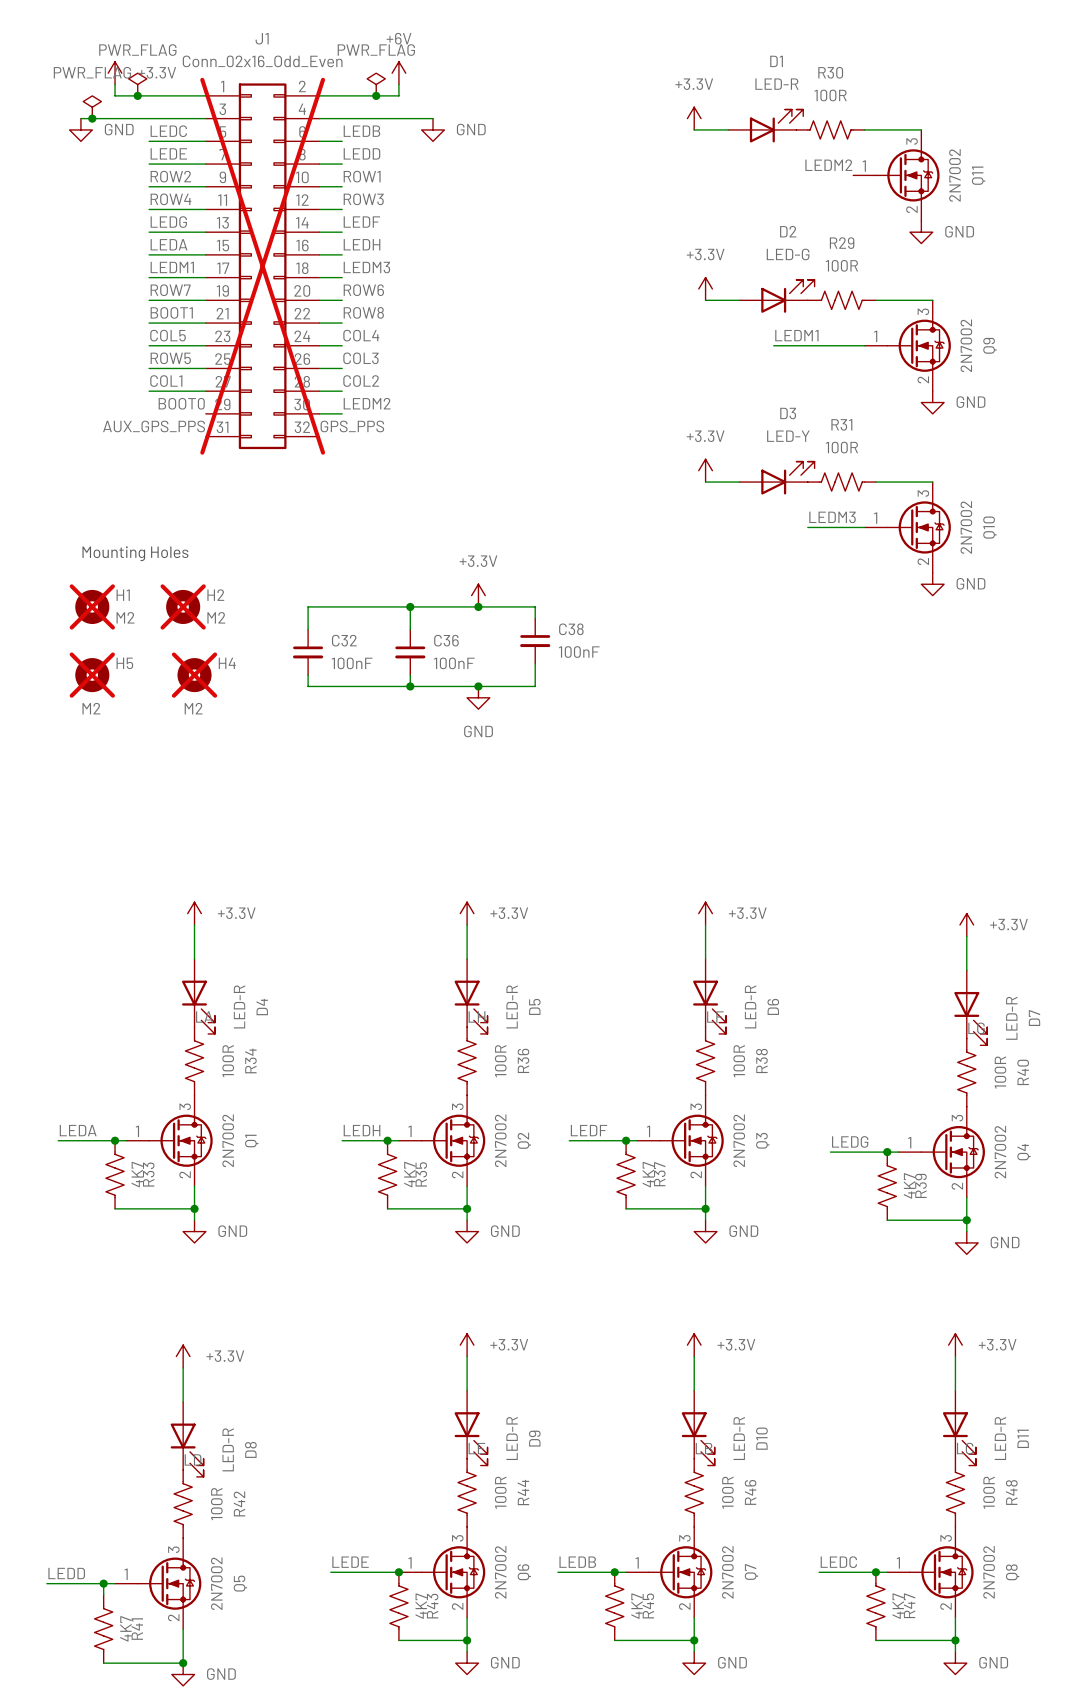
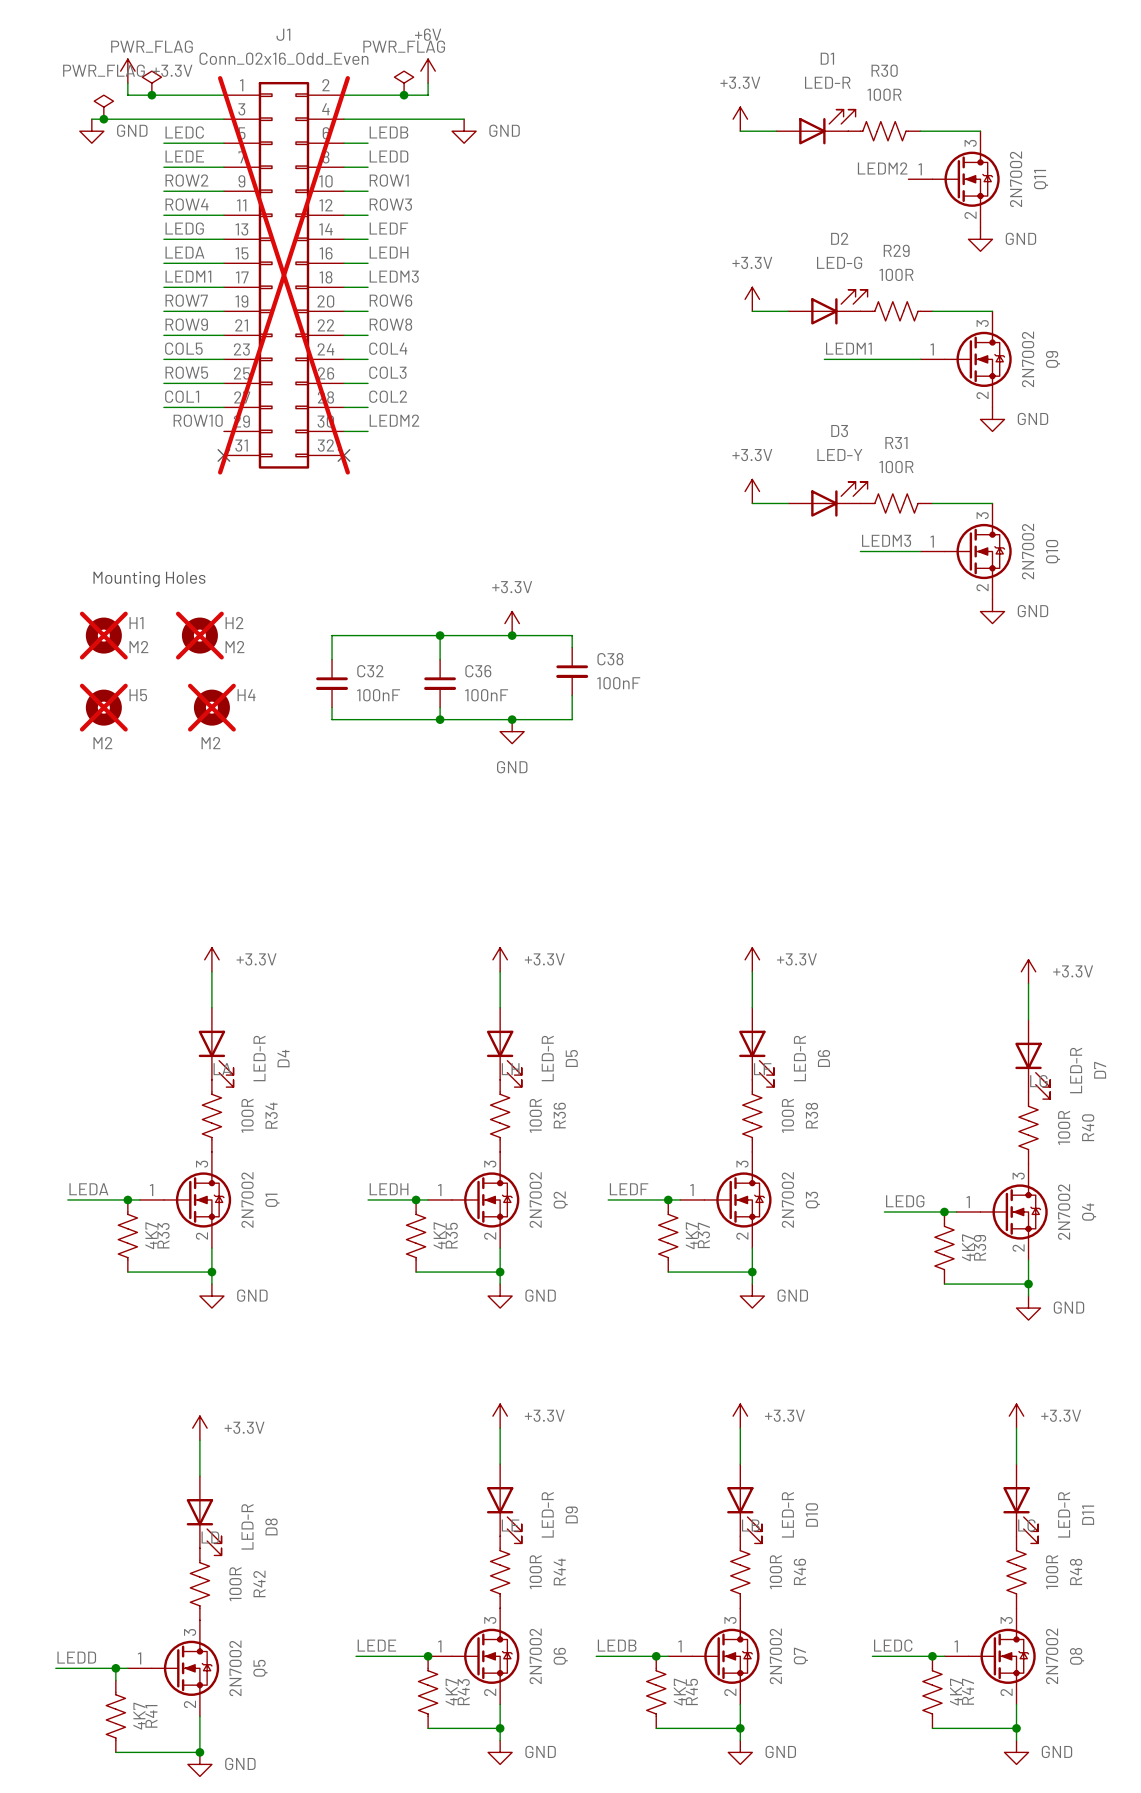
label: BOOT1 (171, 312) -> ROW9 (186, 324)
label: BOOT0 (181, 403) -> ROW10 (198, 420)
label: AUX_GPS_PPS (154, 426) -> none
label: GPS_PPS (352, 426) -> none
no-connect mark: none -> (223, 455)
no-connect mark: none -> (344, 455)

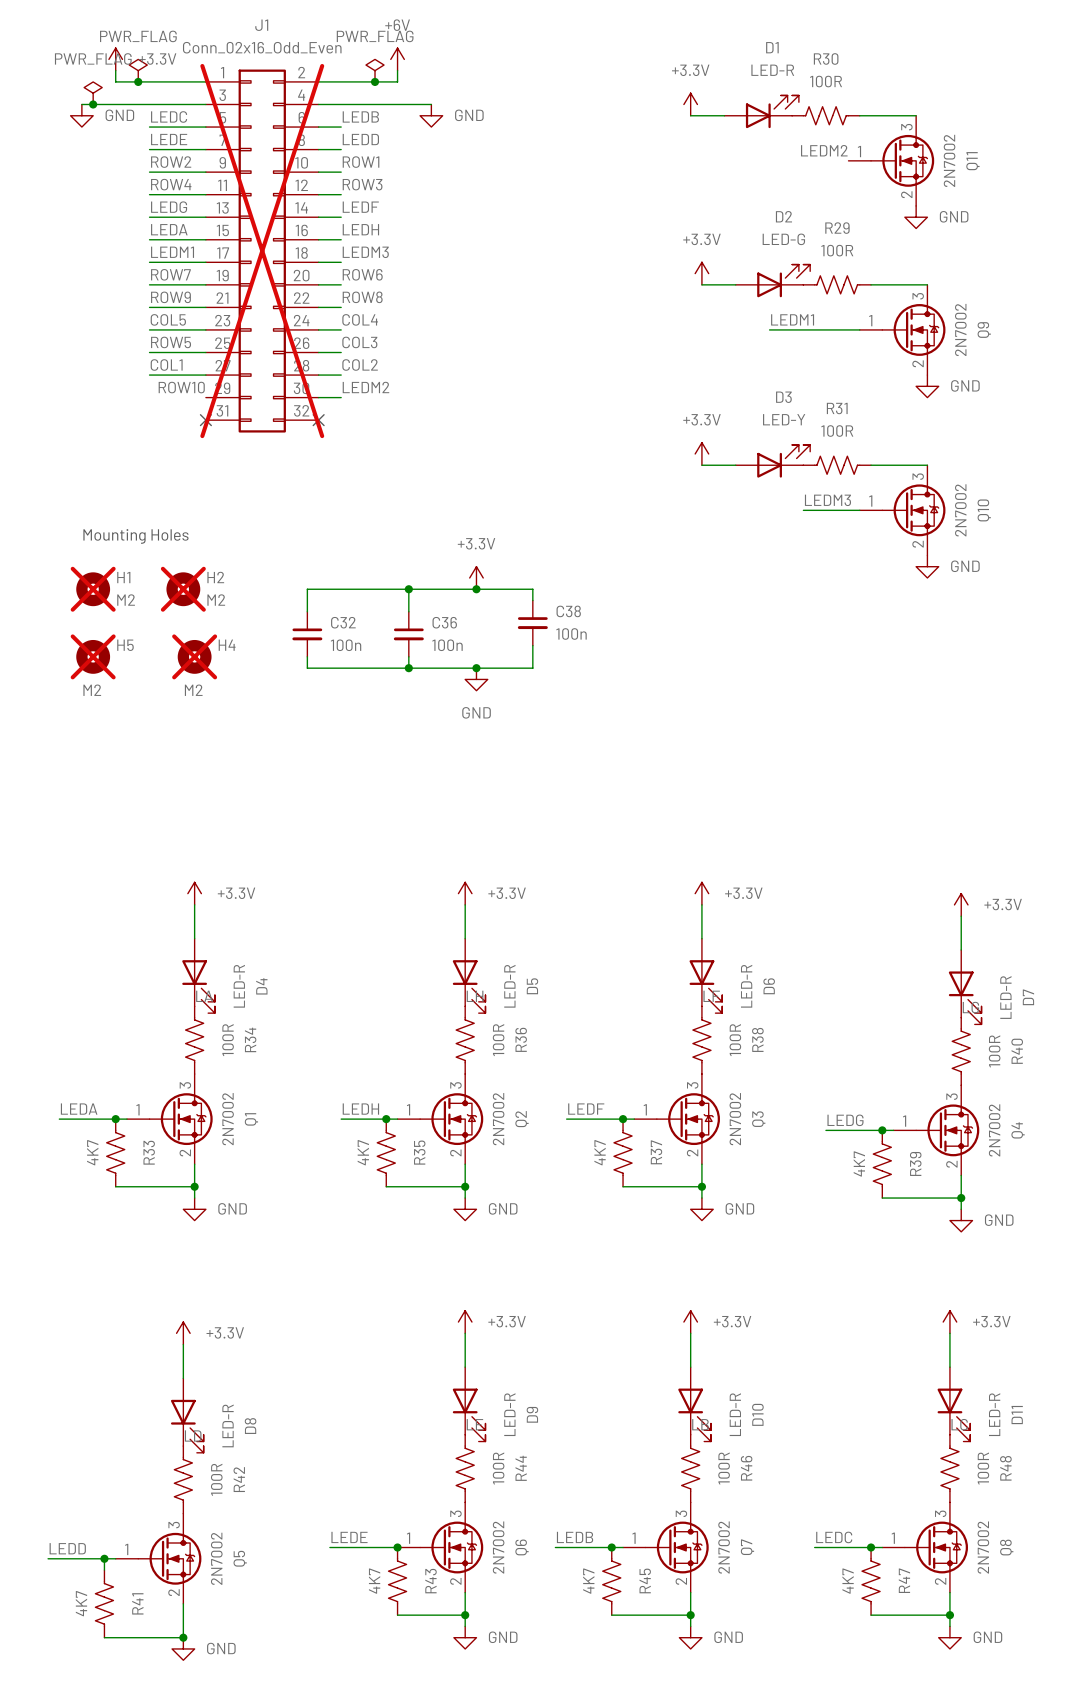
C38 value: 100nF (618, 683) -> 100n (571, 633)
C32 value: 100nF (378, 695) -> 100n (346, 645)
C36 value: 100nF (486, 695) -> 100n (447, 645)
R33 value position: 4K7 (151, 1235) -> 4K7 (92, 1152)
R35 value position: 4K7 (439, 1235) -> 4K7 (363, 1152)
R37 value position: 4K7 (691, 1235) -> 4K7 (600, 1152)
R39 value position: 4K7 (968, 1247) -> 4K7 (859, 1163)
R43 value position: 4K7 (451, 1692) -> 4K7 (374, 1581)
R45 value position: 4K7 (679, 1692) -> 4K7 (588, 1581)
R47 value position: 4K7 (956, 1692) -> 4K7 (848, 1581)
R41 value position: 4K7 (139, 1716) -> 4K7 (81, 1603)

